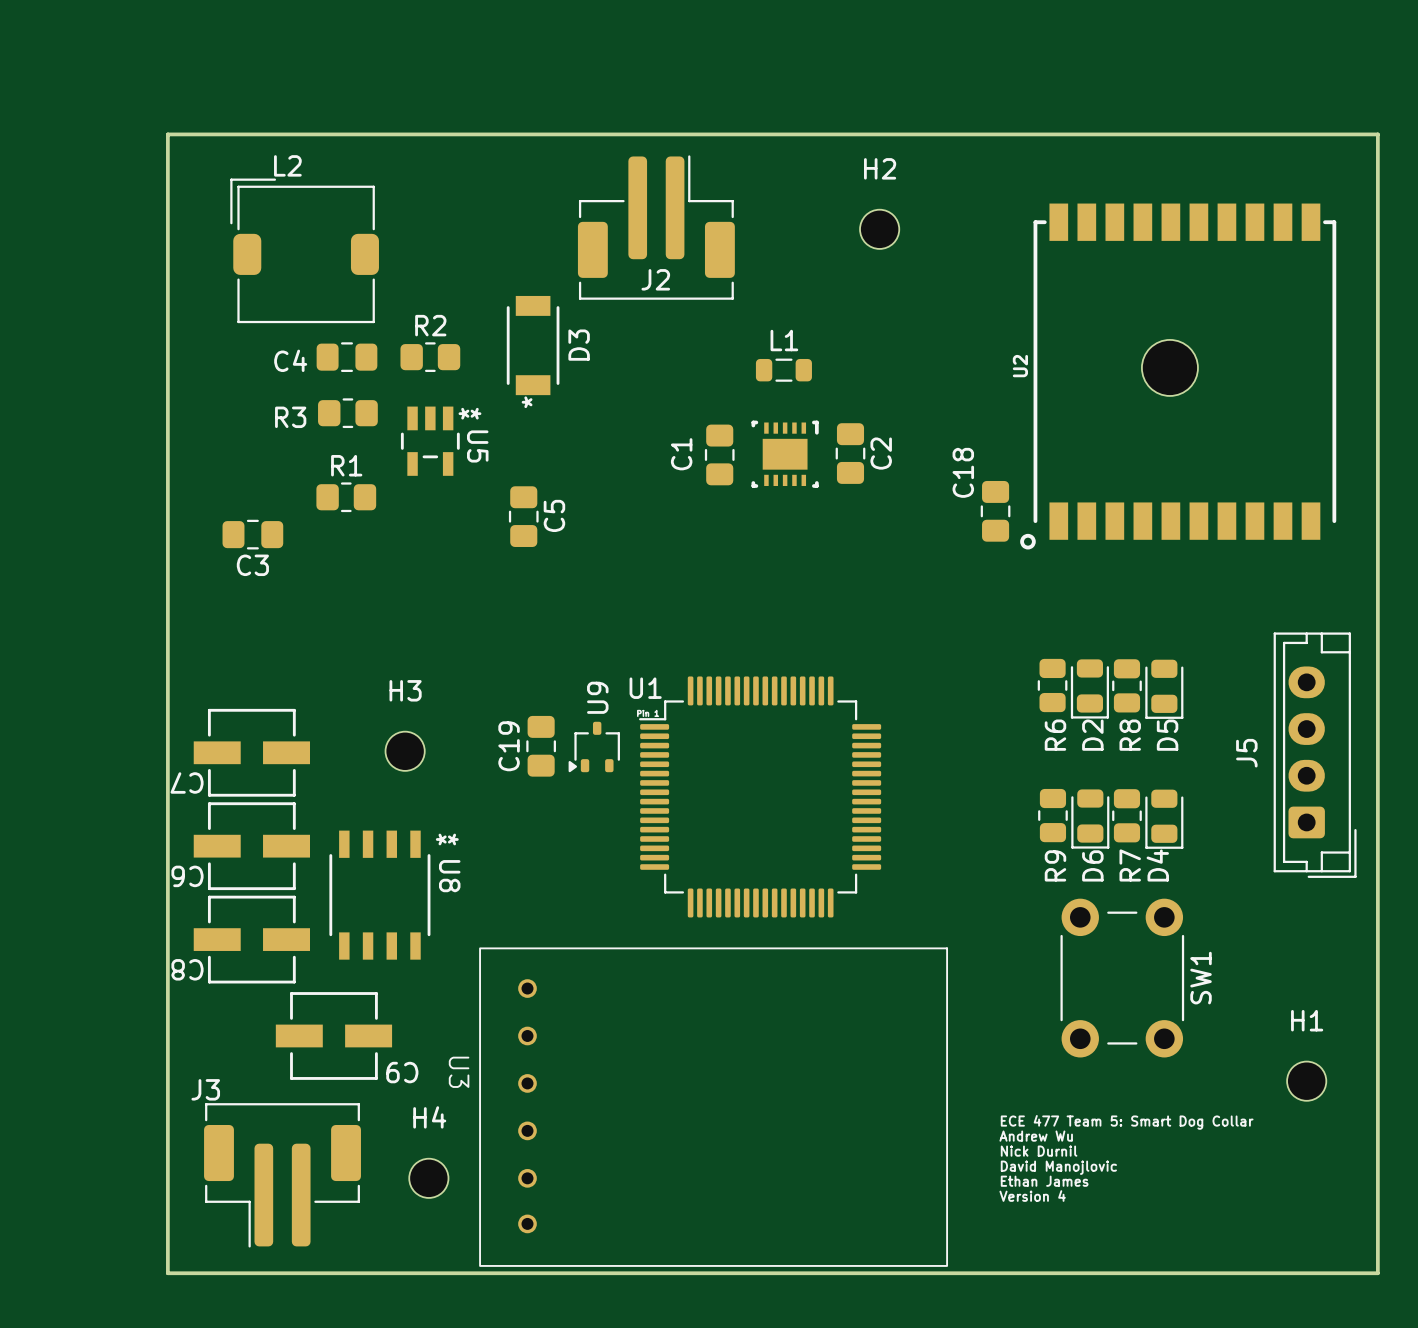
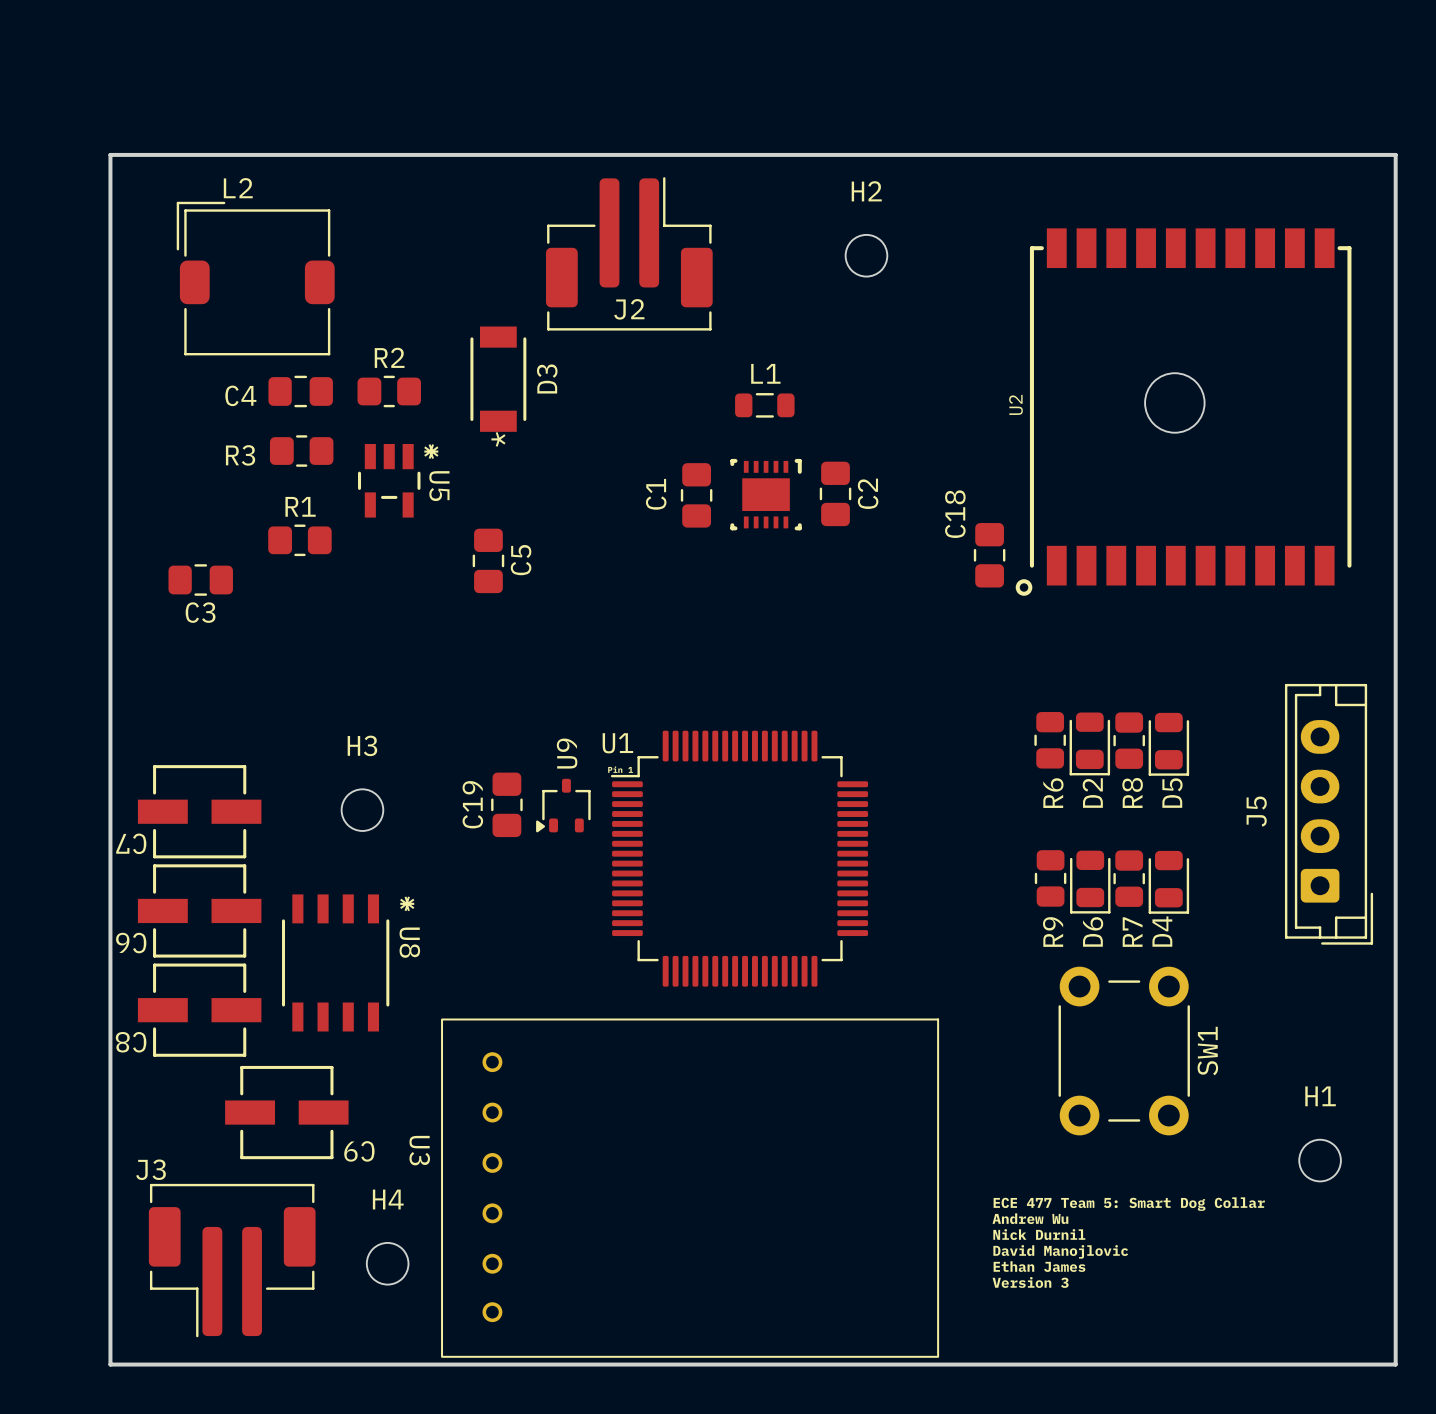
text: Version 4 (1032, 1196) -> Version 3 (1030, 1282)

